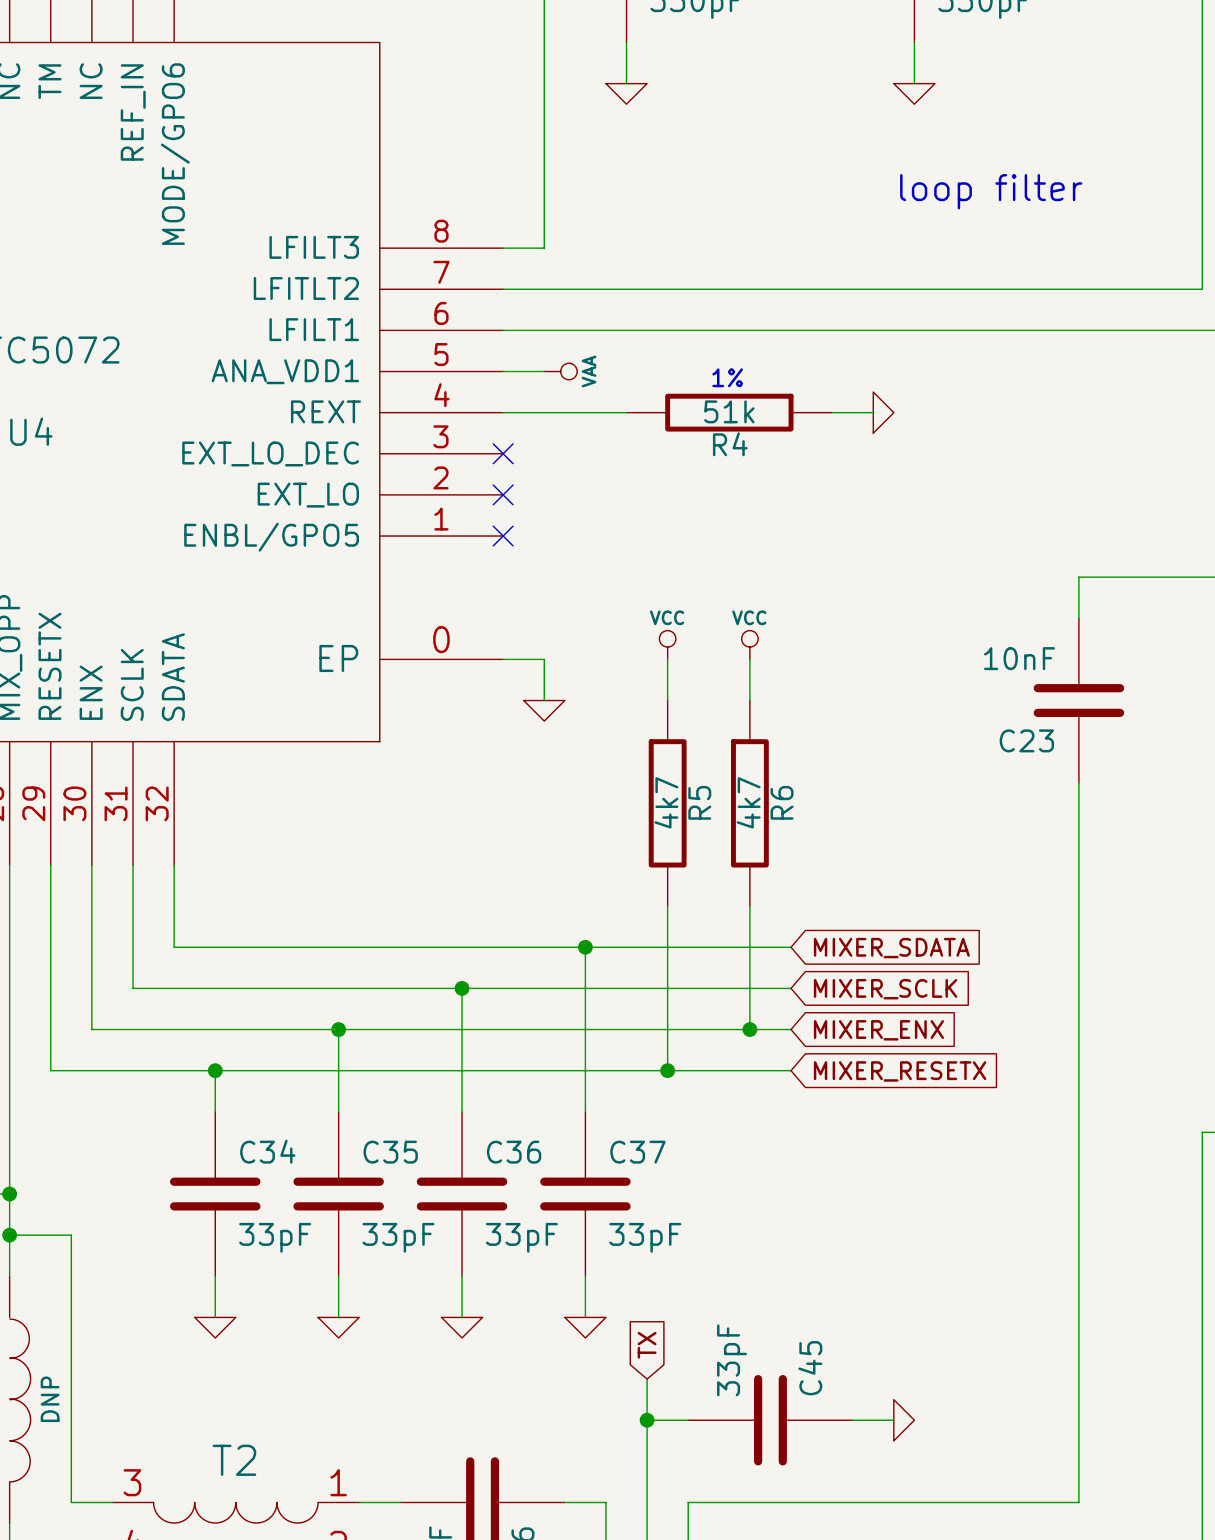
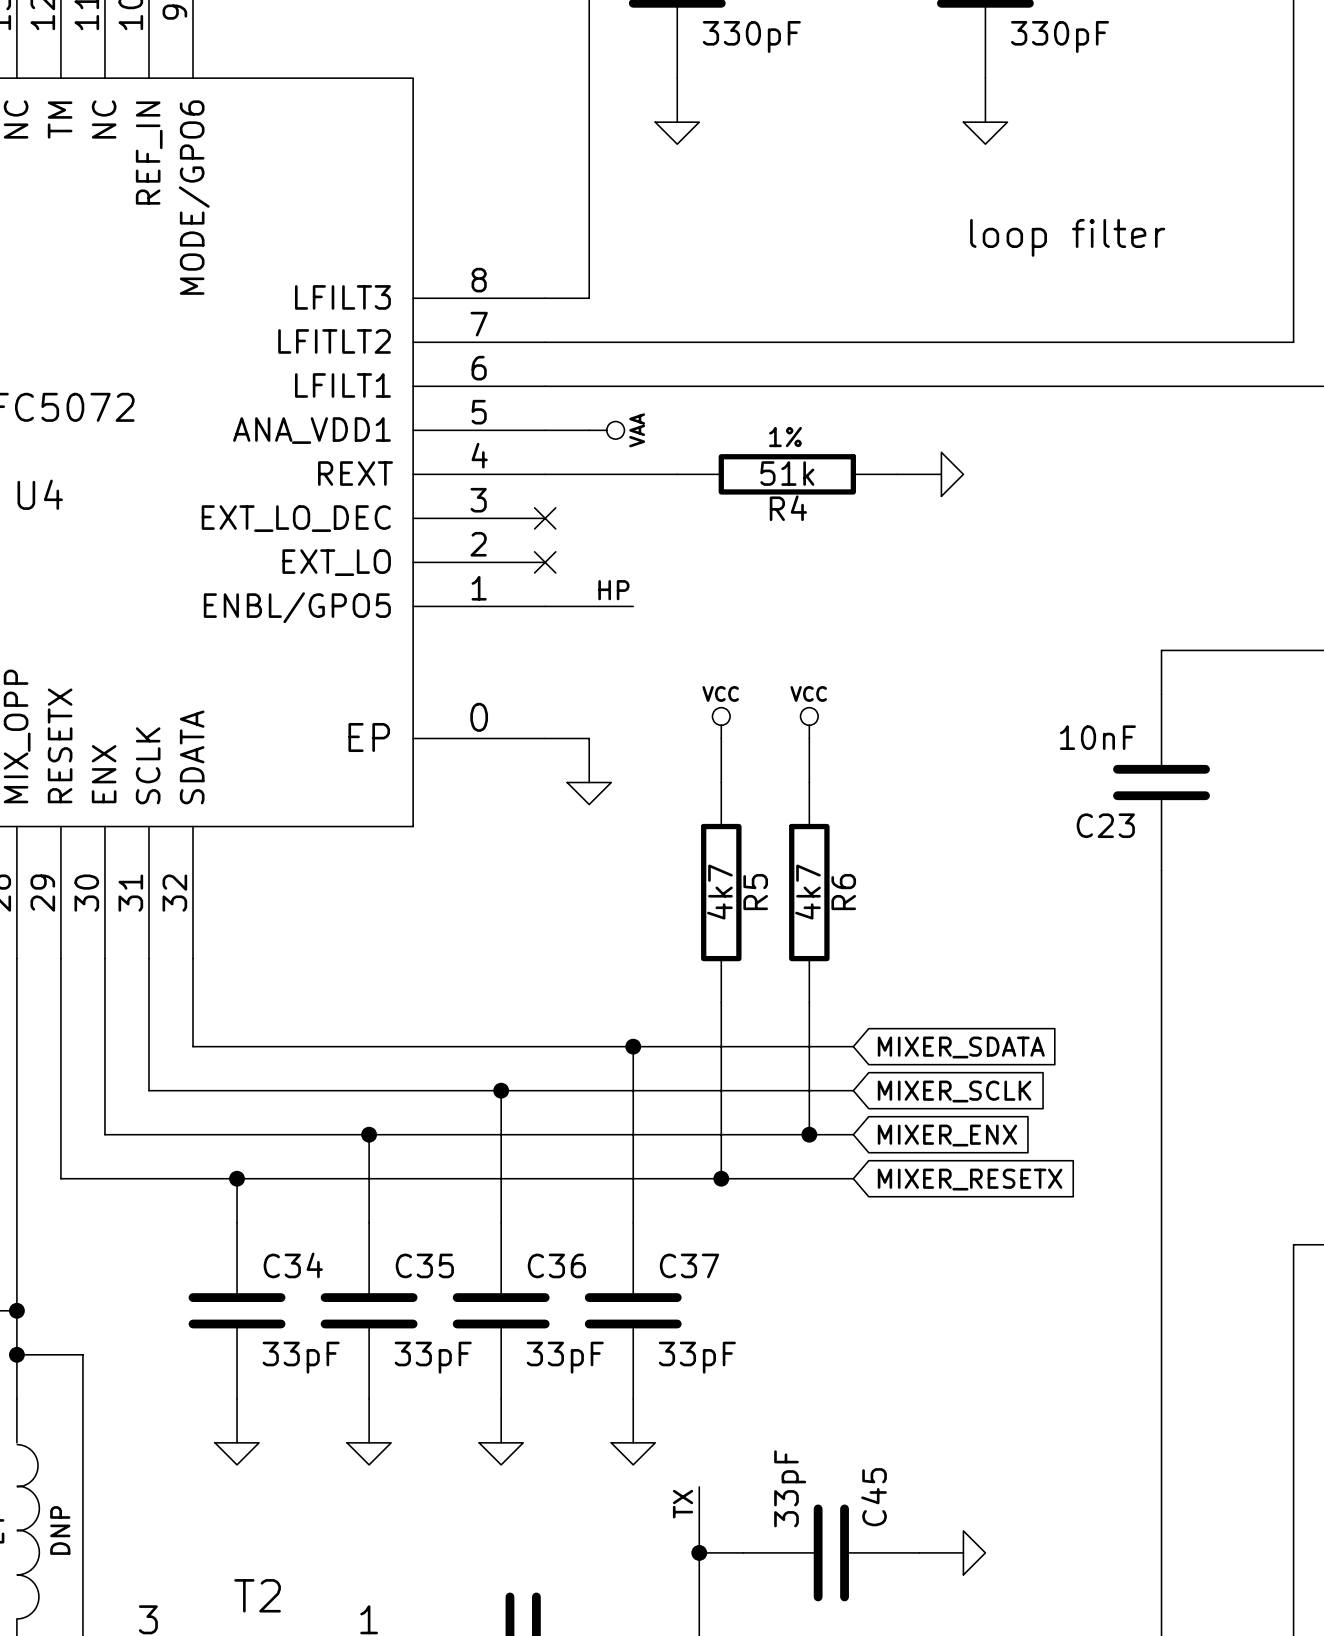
label: none -> HP (613, 590)
wire: none -> (545, 606) (633, 606)
no-connect mark: (503, 536) -> none
global label: TX (647, 1345) -> none
wire: none -> (699, 1486) (699, 1508)
label: none -> TX (683, 1504)

